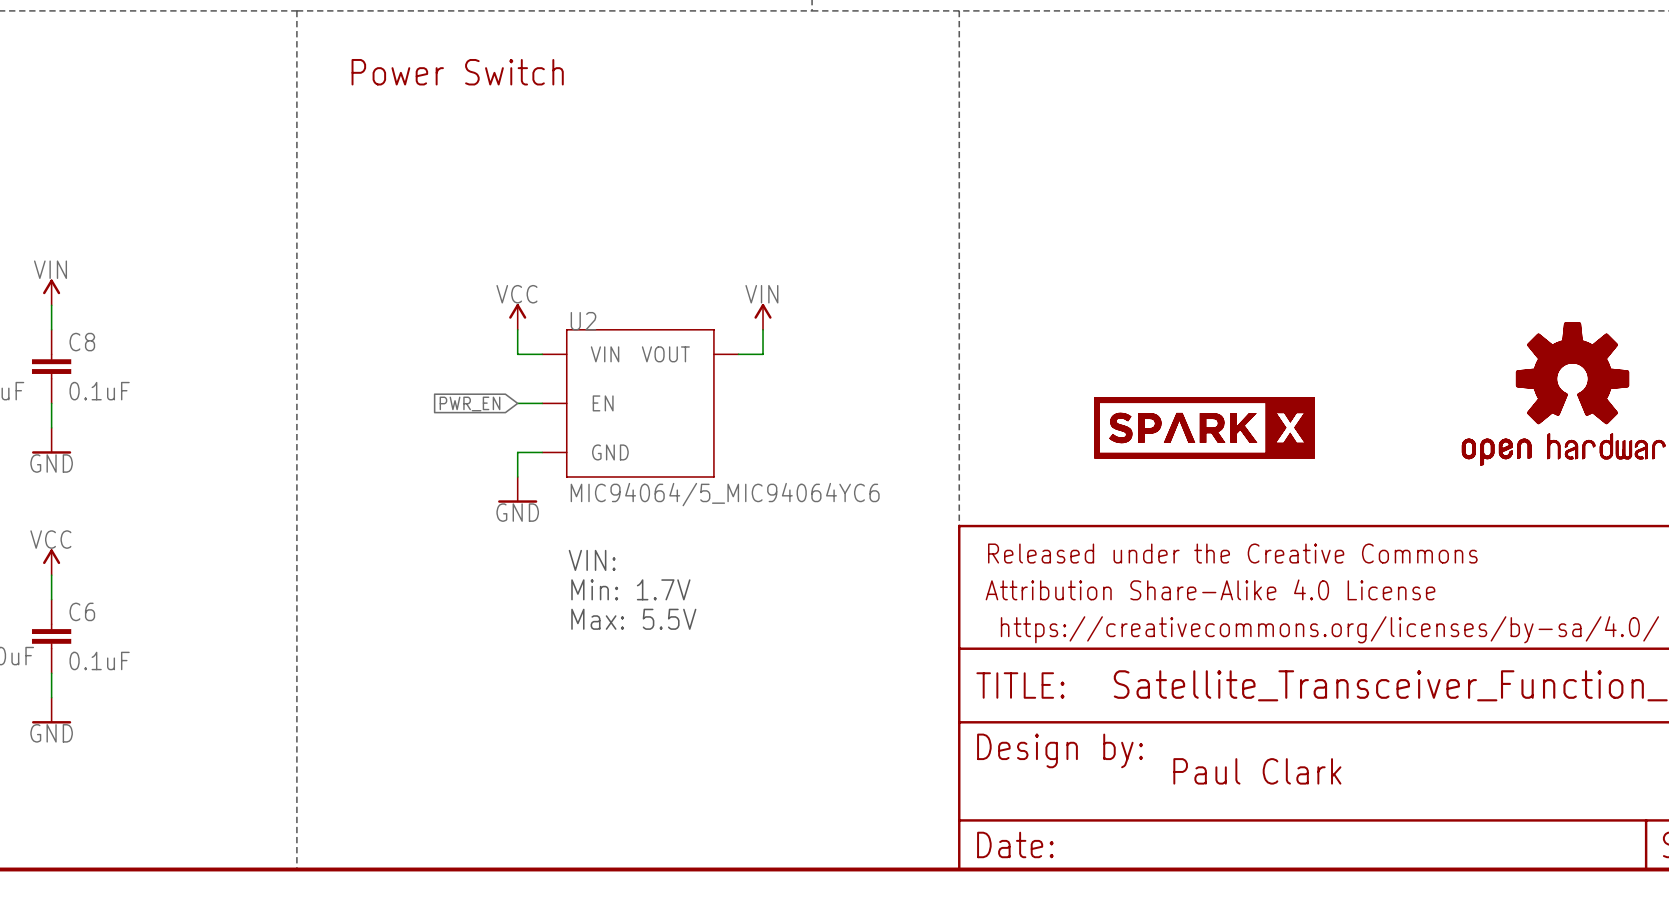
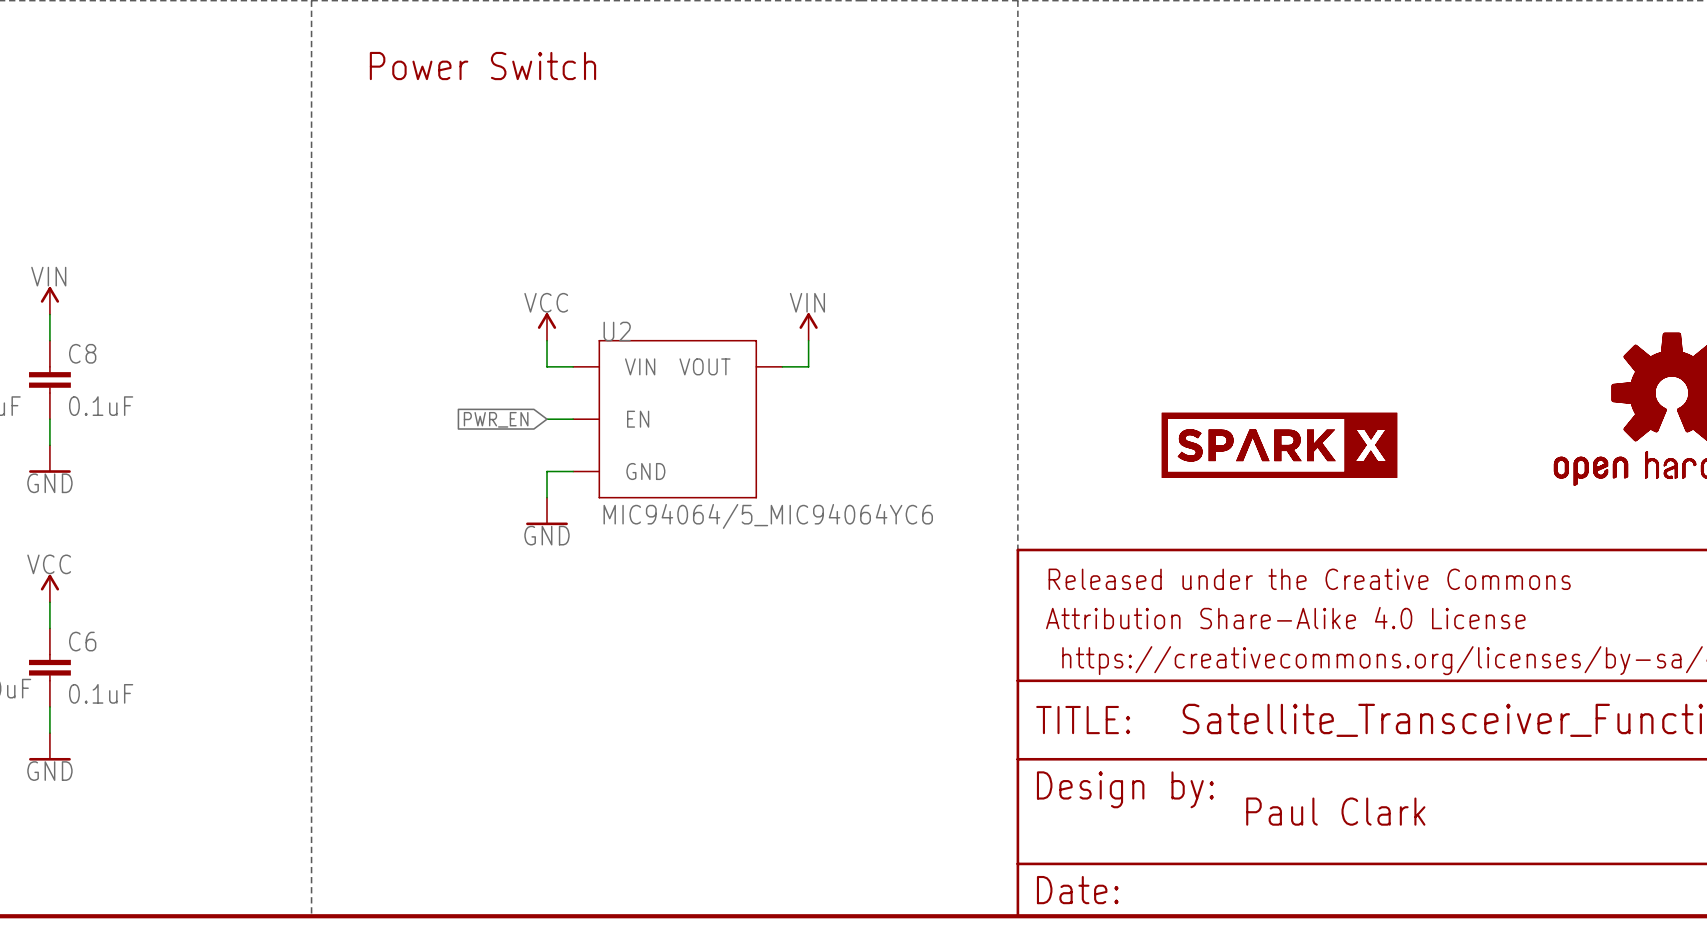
text: VIN: (592, 560) -> none
text: Min: 1.7V (630, 589) -> none
text: Max: 5.5V (633, 619) -> none

